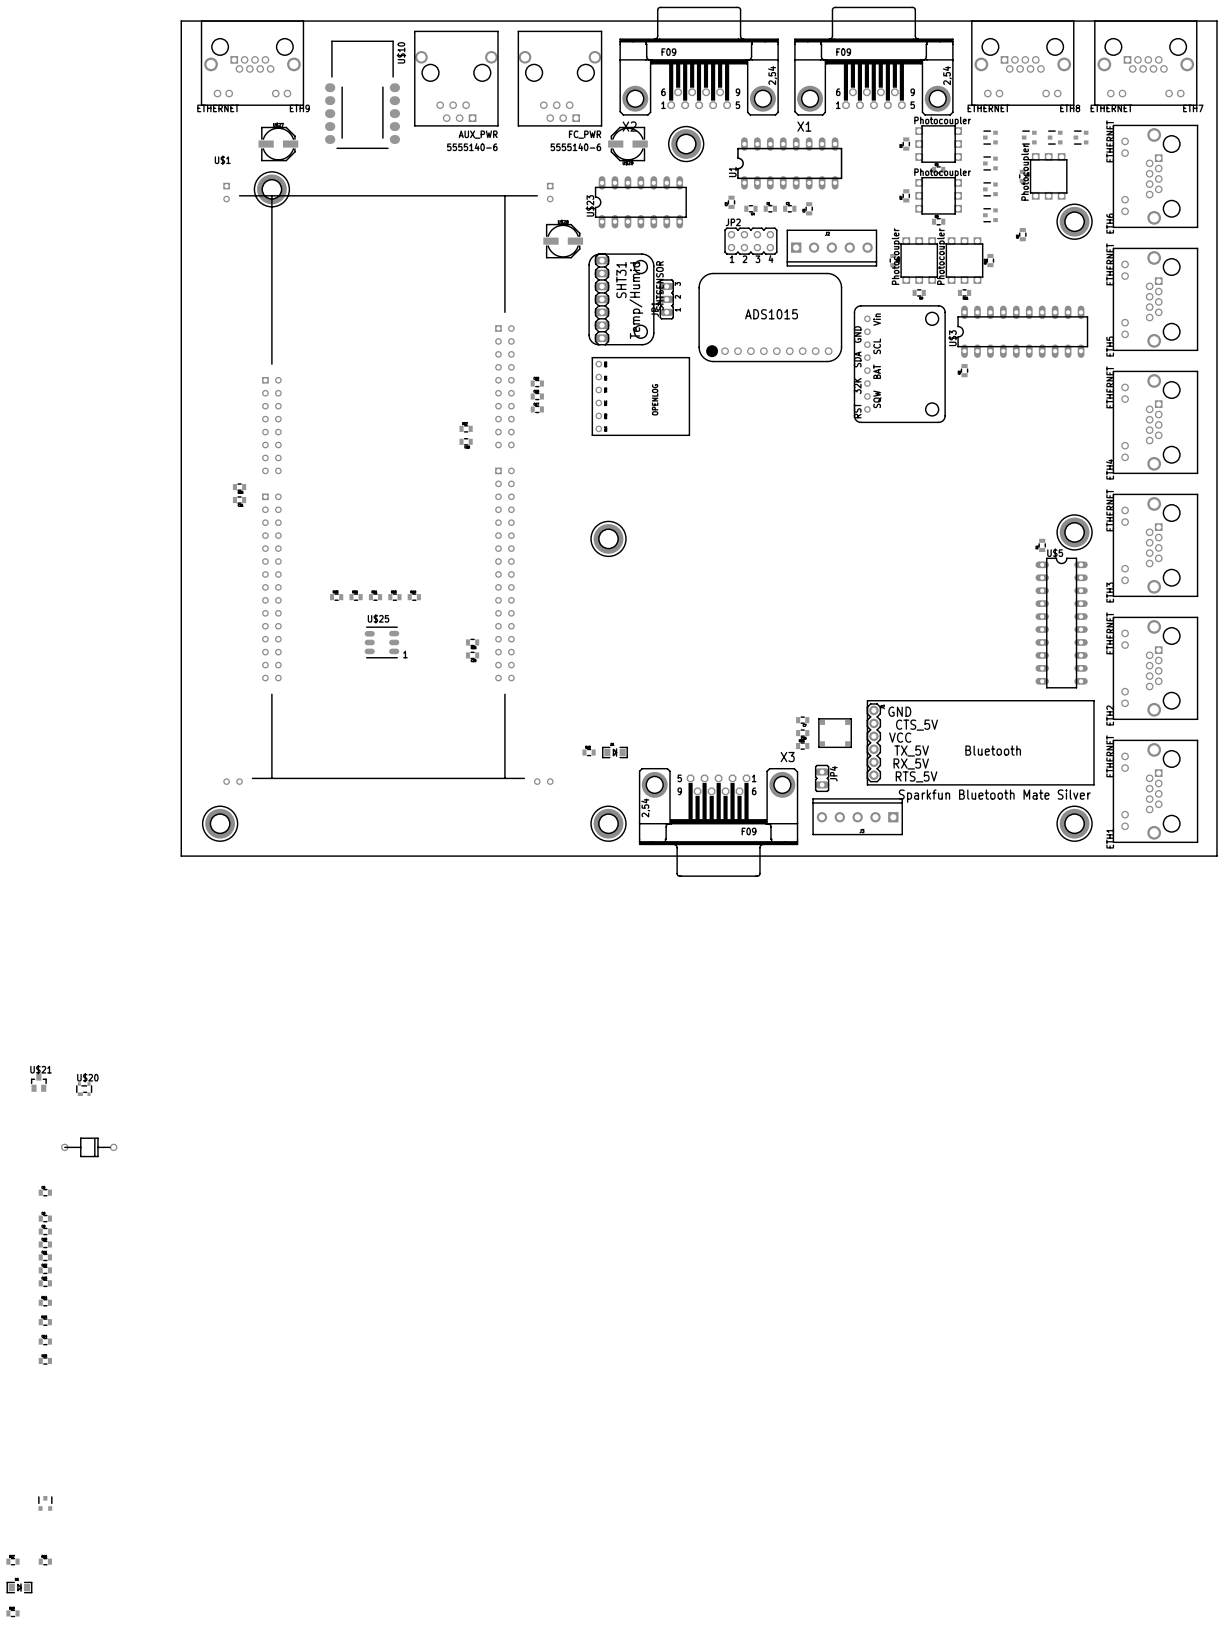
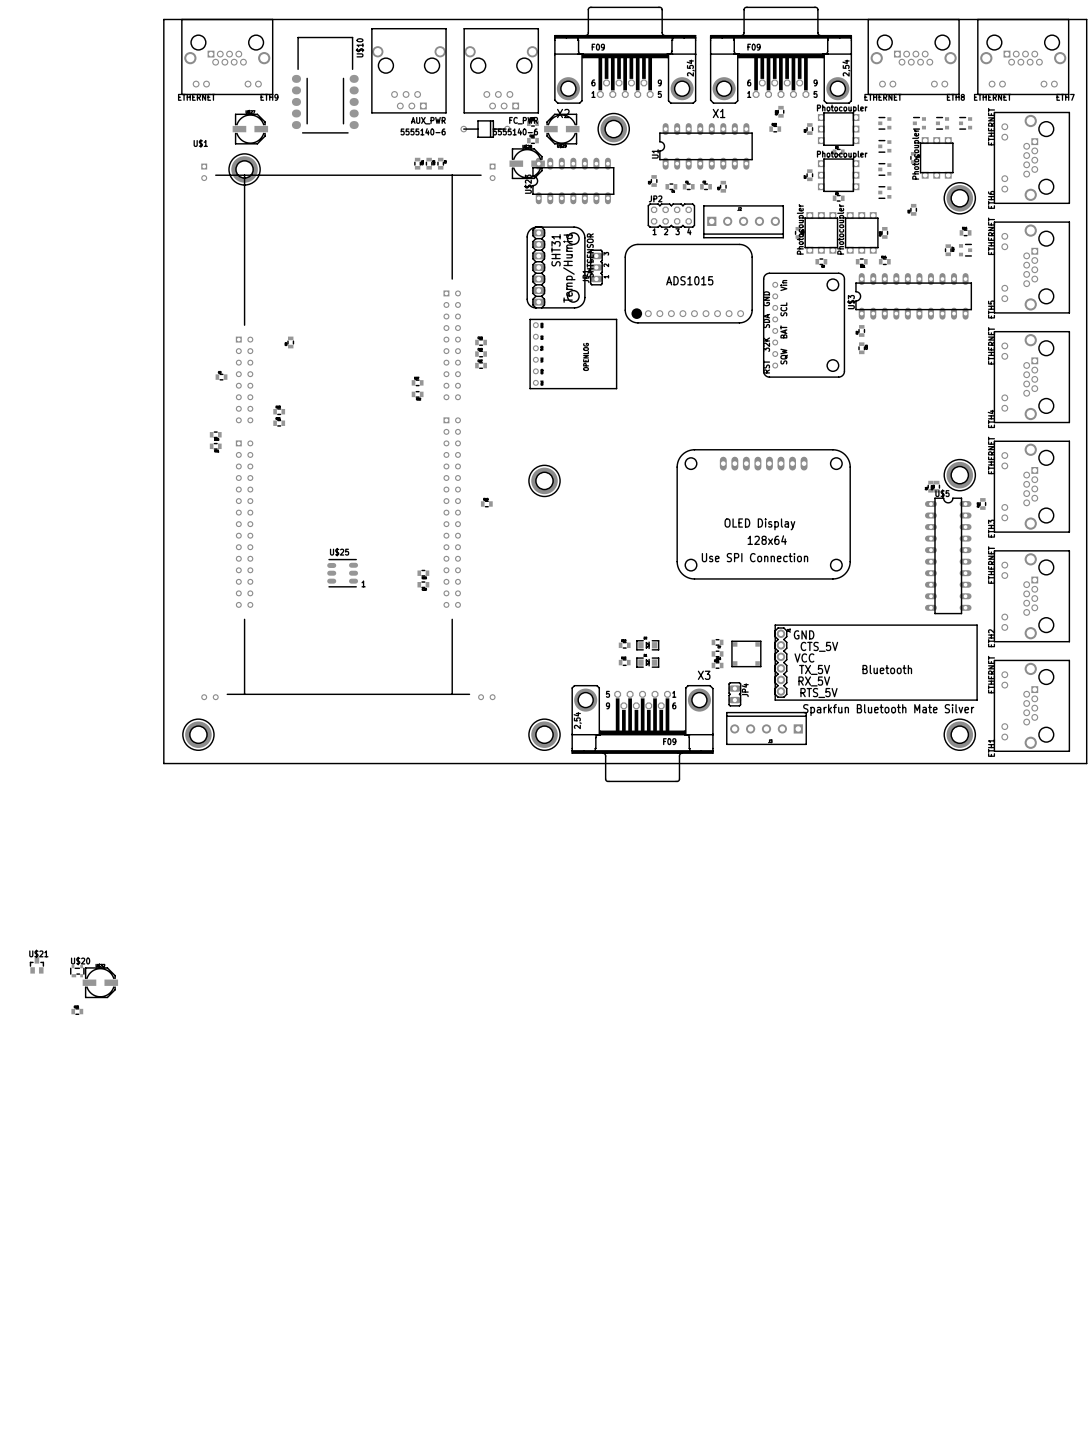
part: none -> (485, 129)
part position: (563, 241) -> (527, 163)
part: none -> (965, 250)
part: none -> (763, 514)
part position: (336, 597) -> (775, 129)
part rotation: 0° (356, 597) -> 90° clockwise (780, 111)
part position: (356, 597) -> (780, 111)
part position: (375, 597) -> (279, 423)
part position: (394, 597) -> (279, 411)
part position: (414, 597) -> (486, 503)
part position: (589, 752) -> (624, 662)
part position: (614, 752) -> (647, 662)
part: none -> (100, 982)
part: none -> (77, 1011)
part: (89, 1147) -> none
part position: (45, 1192) -> (221, 377)
part rotation: 0° (45, 1218) -> 90° clockwise (290, 342)
part position: (45, 1218) -> (290, 342)
part rotation: 0° (45, 1231) -> 90° clockwise (440, 163)
part position: (45, 1231) -> (440, 163)
part rotation: 0° (45, 1244) -> 90° clockwise (429, 163)
part position: (45, 1244) -> (429, 163)
part rotation: 0° (45, 1257) -> 90° clockwise (417, 163)
part position: (45, 1257) -> (417, 163)
part position: (45, 1270) -> (532, 140)
part position: (45, 1283) -> (532, 123)
part position: (45, 1302) -> (884, 261)
part rotation: 0° (45, 1322) -> 90° clockwise (982, 503)
part position: (45, 1322) -> (982, 503)
part rotation: 0° (45, 1341) -> 90° clockwise (936, 486)
part position: (45, 1341) -> (936, 486)
part rotation: 0° (45, 1360) -> 90° clockwise (861, 348)
part position: (45, 1360) -> (861, 348)
part: (45, 1503) -> none
part rotation: 0° (12, 1561) -> 90° clockwise (948, 250)
part position: (12, 1561) -> (948, 250)
part position: (45, 1561) -> (965, 232)
part position: (19, 1587) -> (647, 645)
part position: (12, 1613) -> (624, 645)

